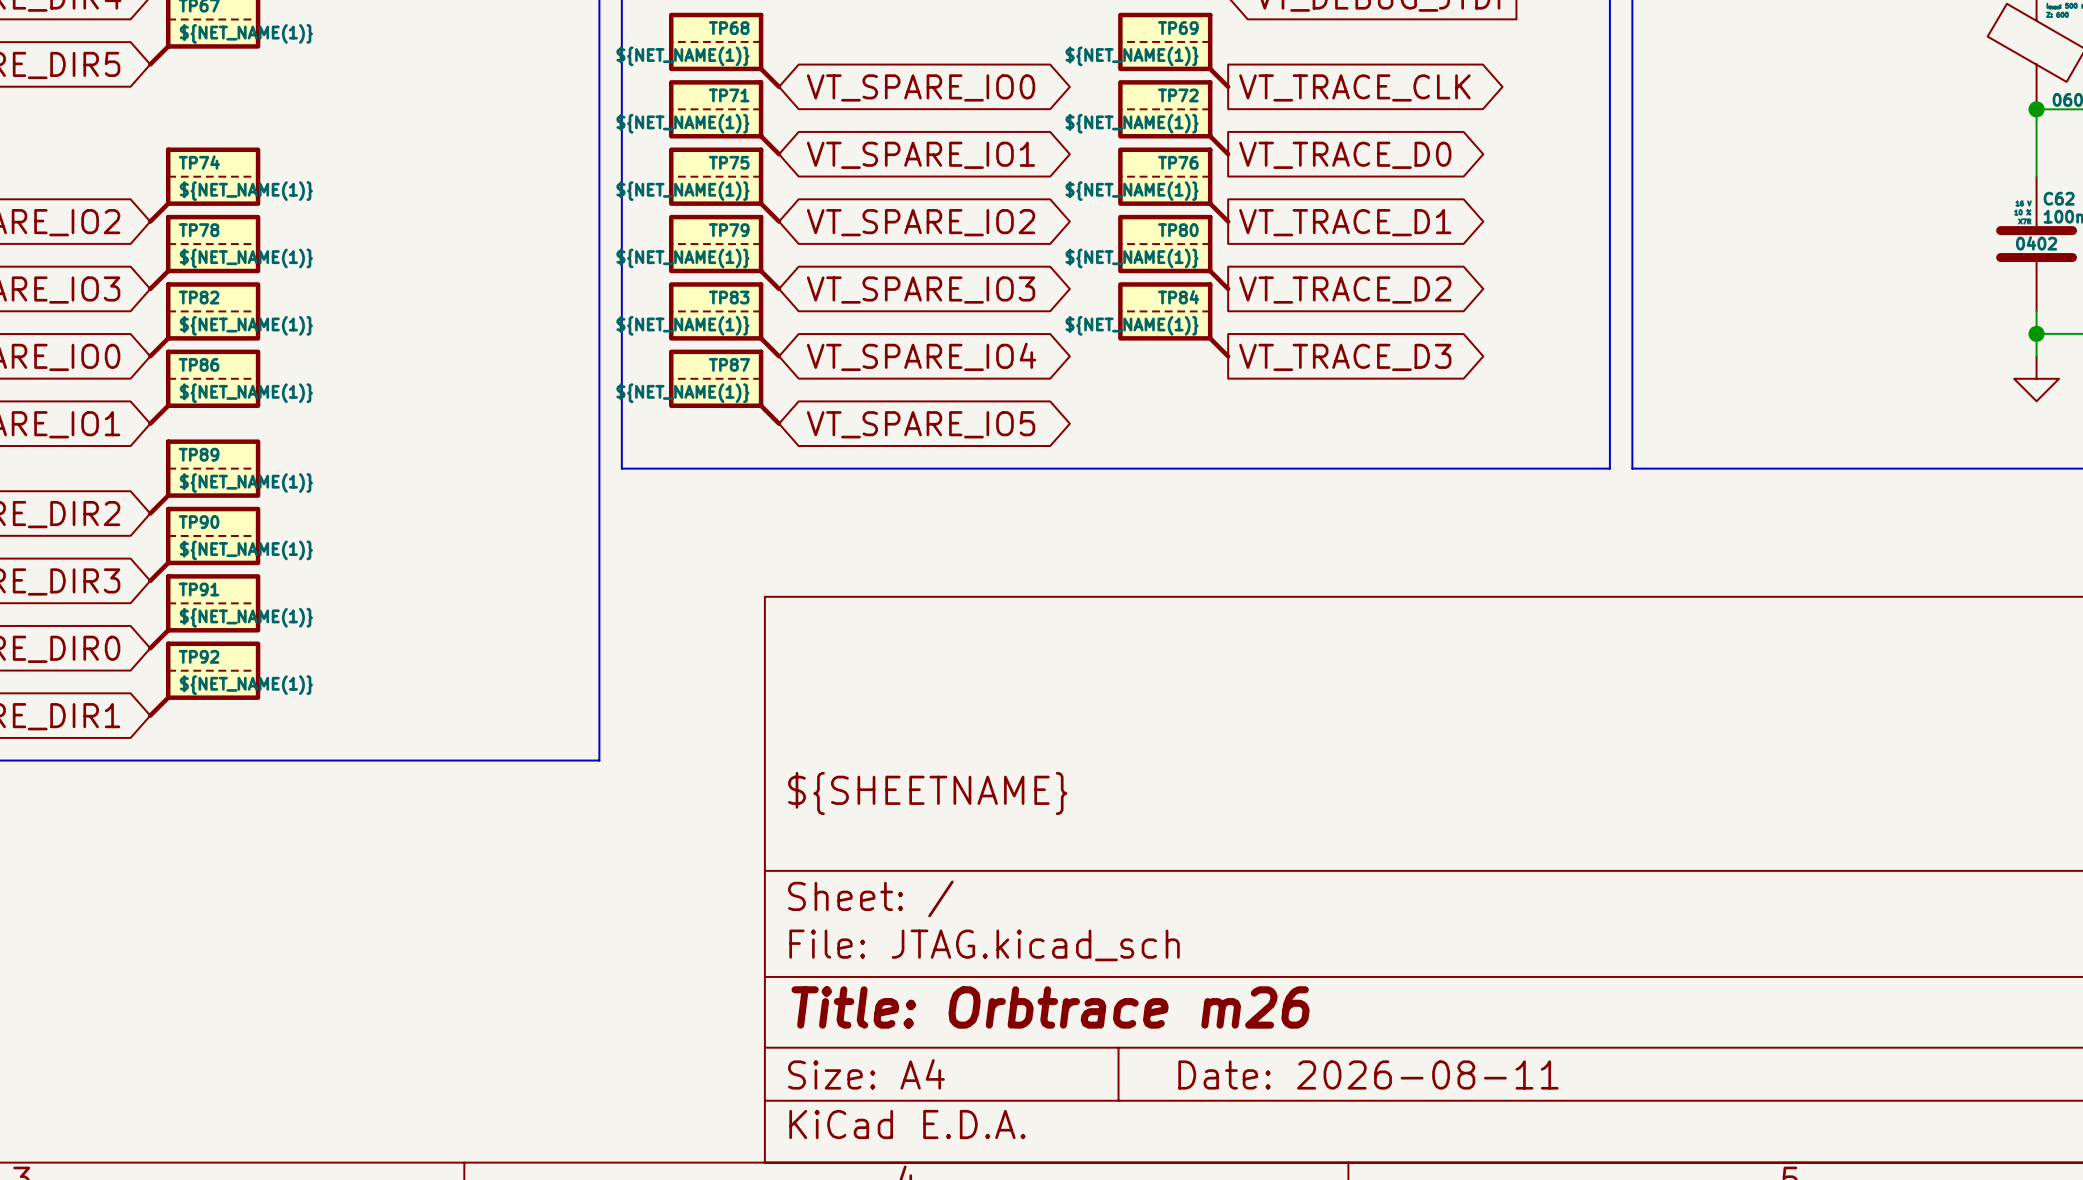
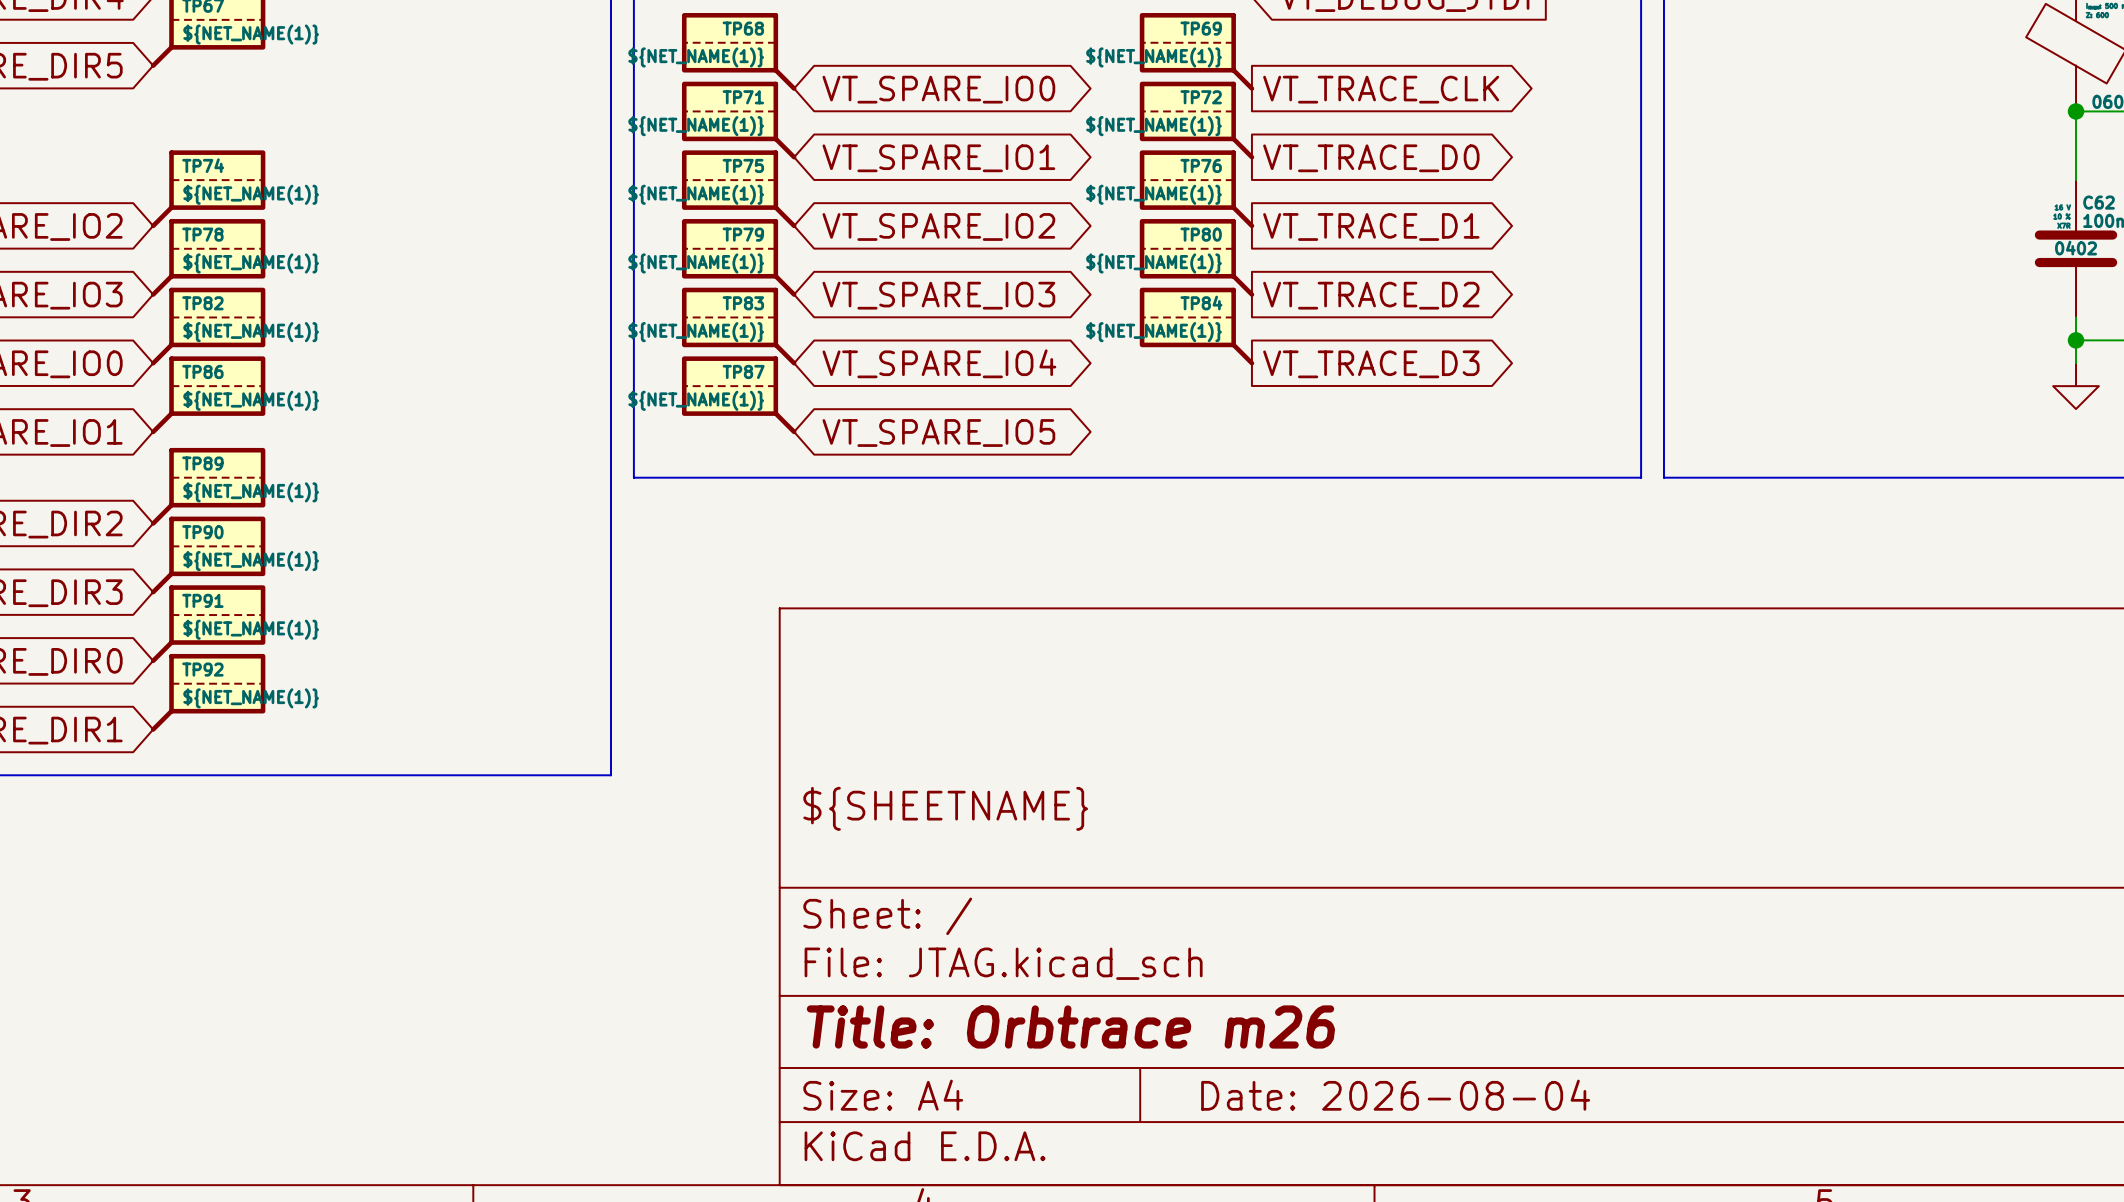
title block: Date: 2026-08-11 (1368, 1074) -> Date: 2026-08-04 (1395, 1095)

